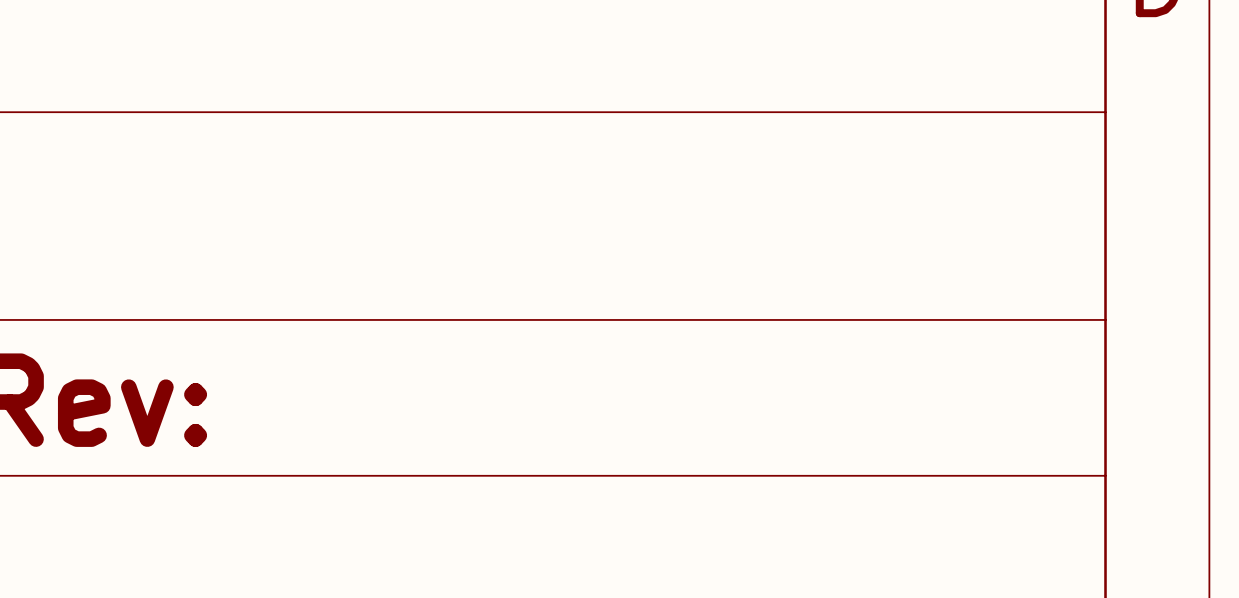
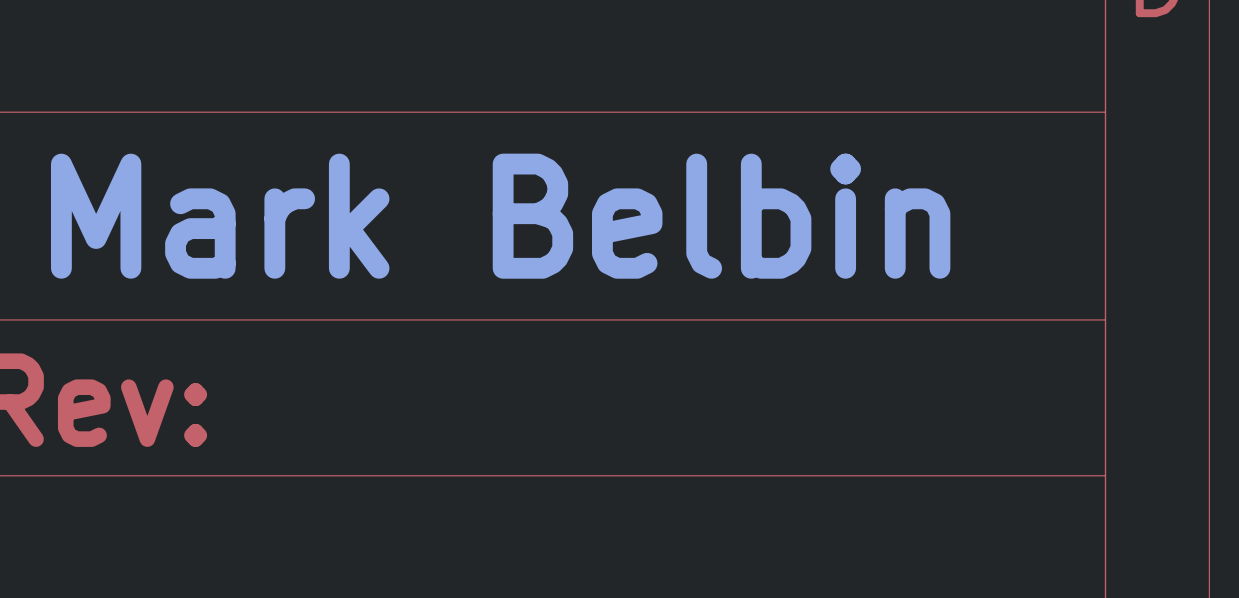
text: none -> Mark Belbin (500, 216)

